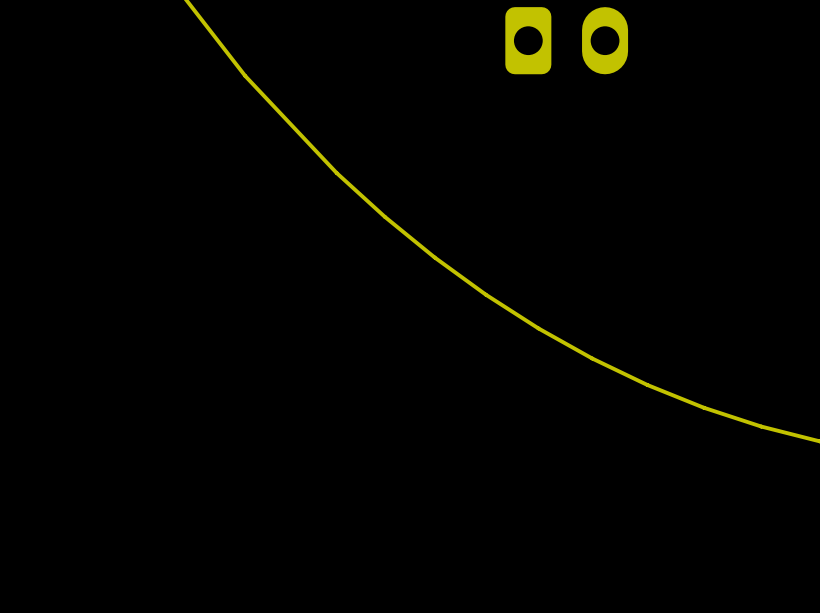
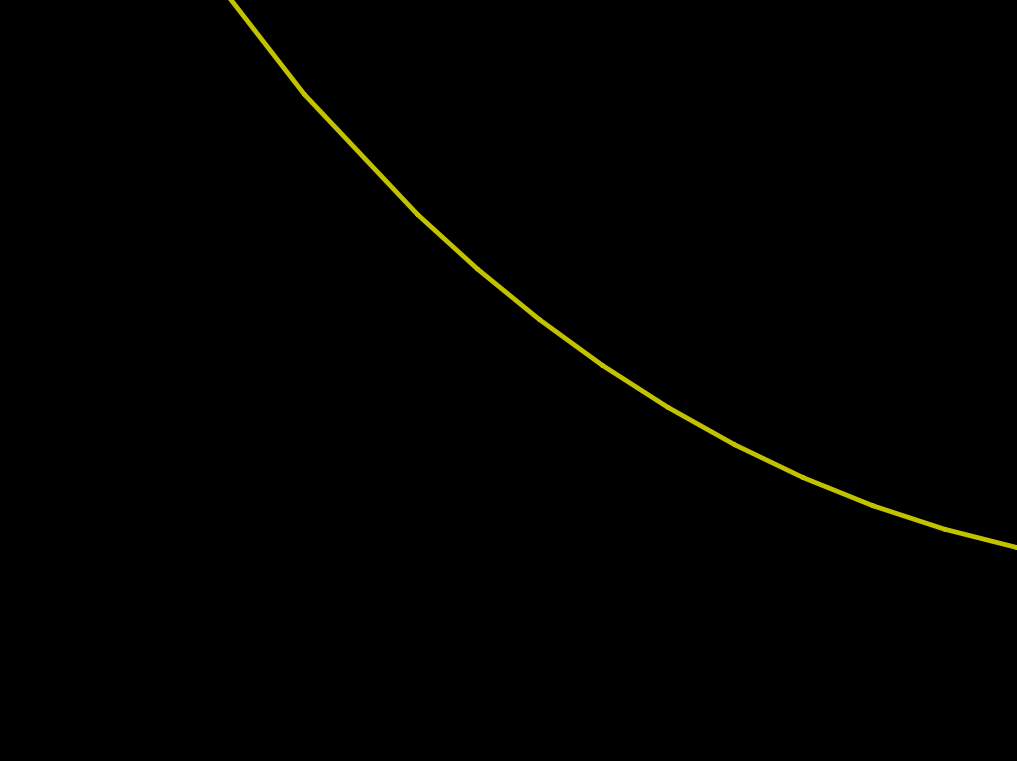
part: (566, 40) -> none

